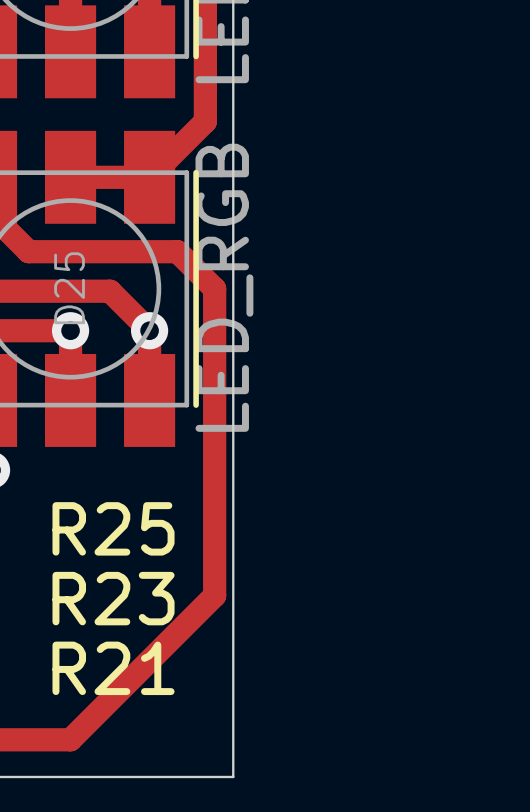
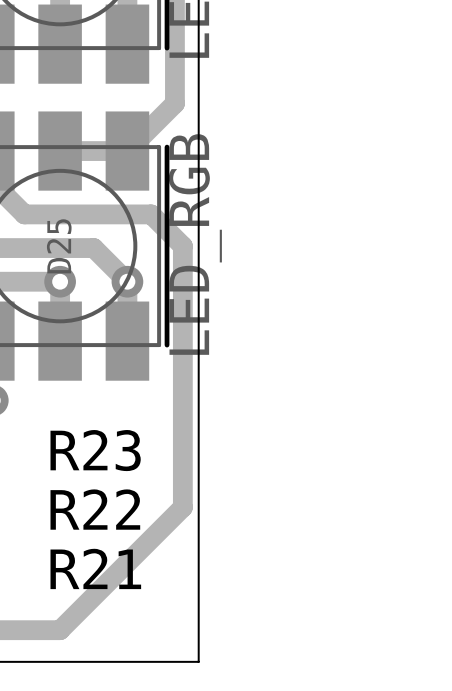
R25 name: R25 (113, 528) -> R23 (95, 450)
R23 name: R23 (113, 598) -> R22 (95, 509)

